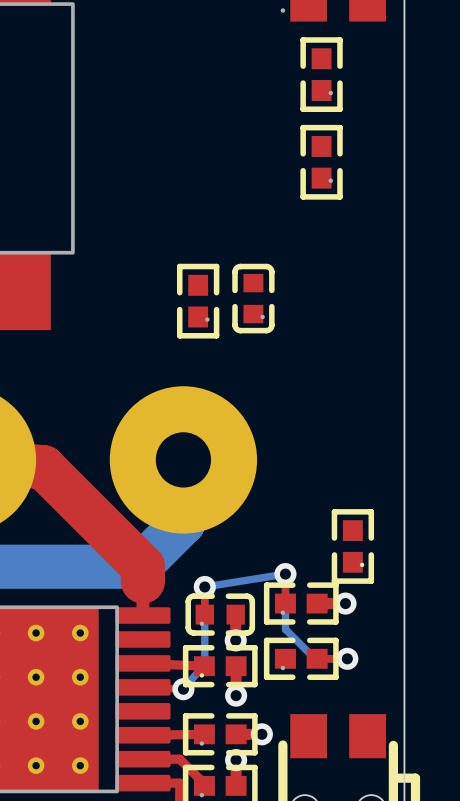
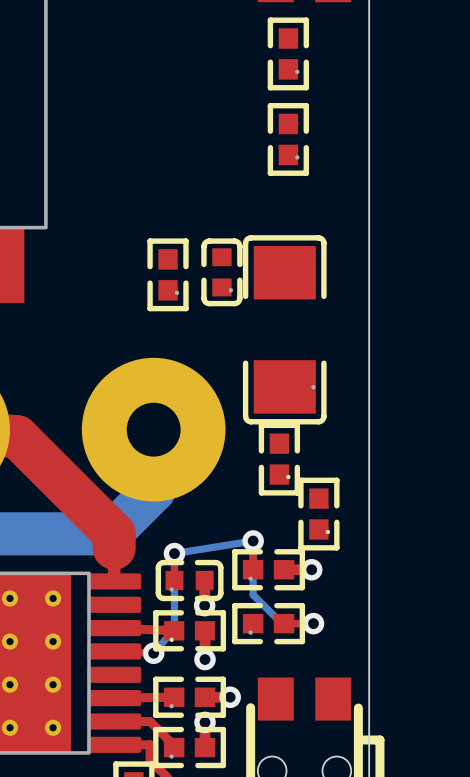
part: none -> (284, 329)
part: none -> (279, 459)

